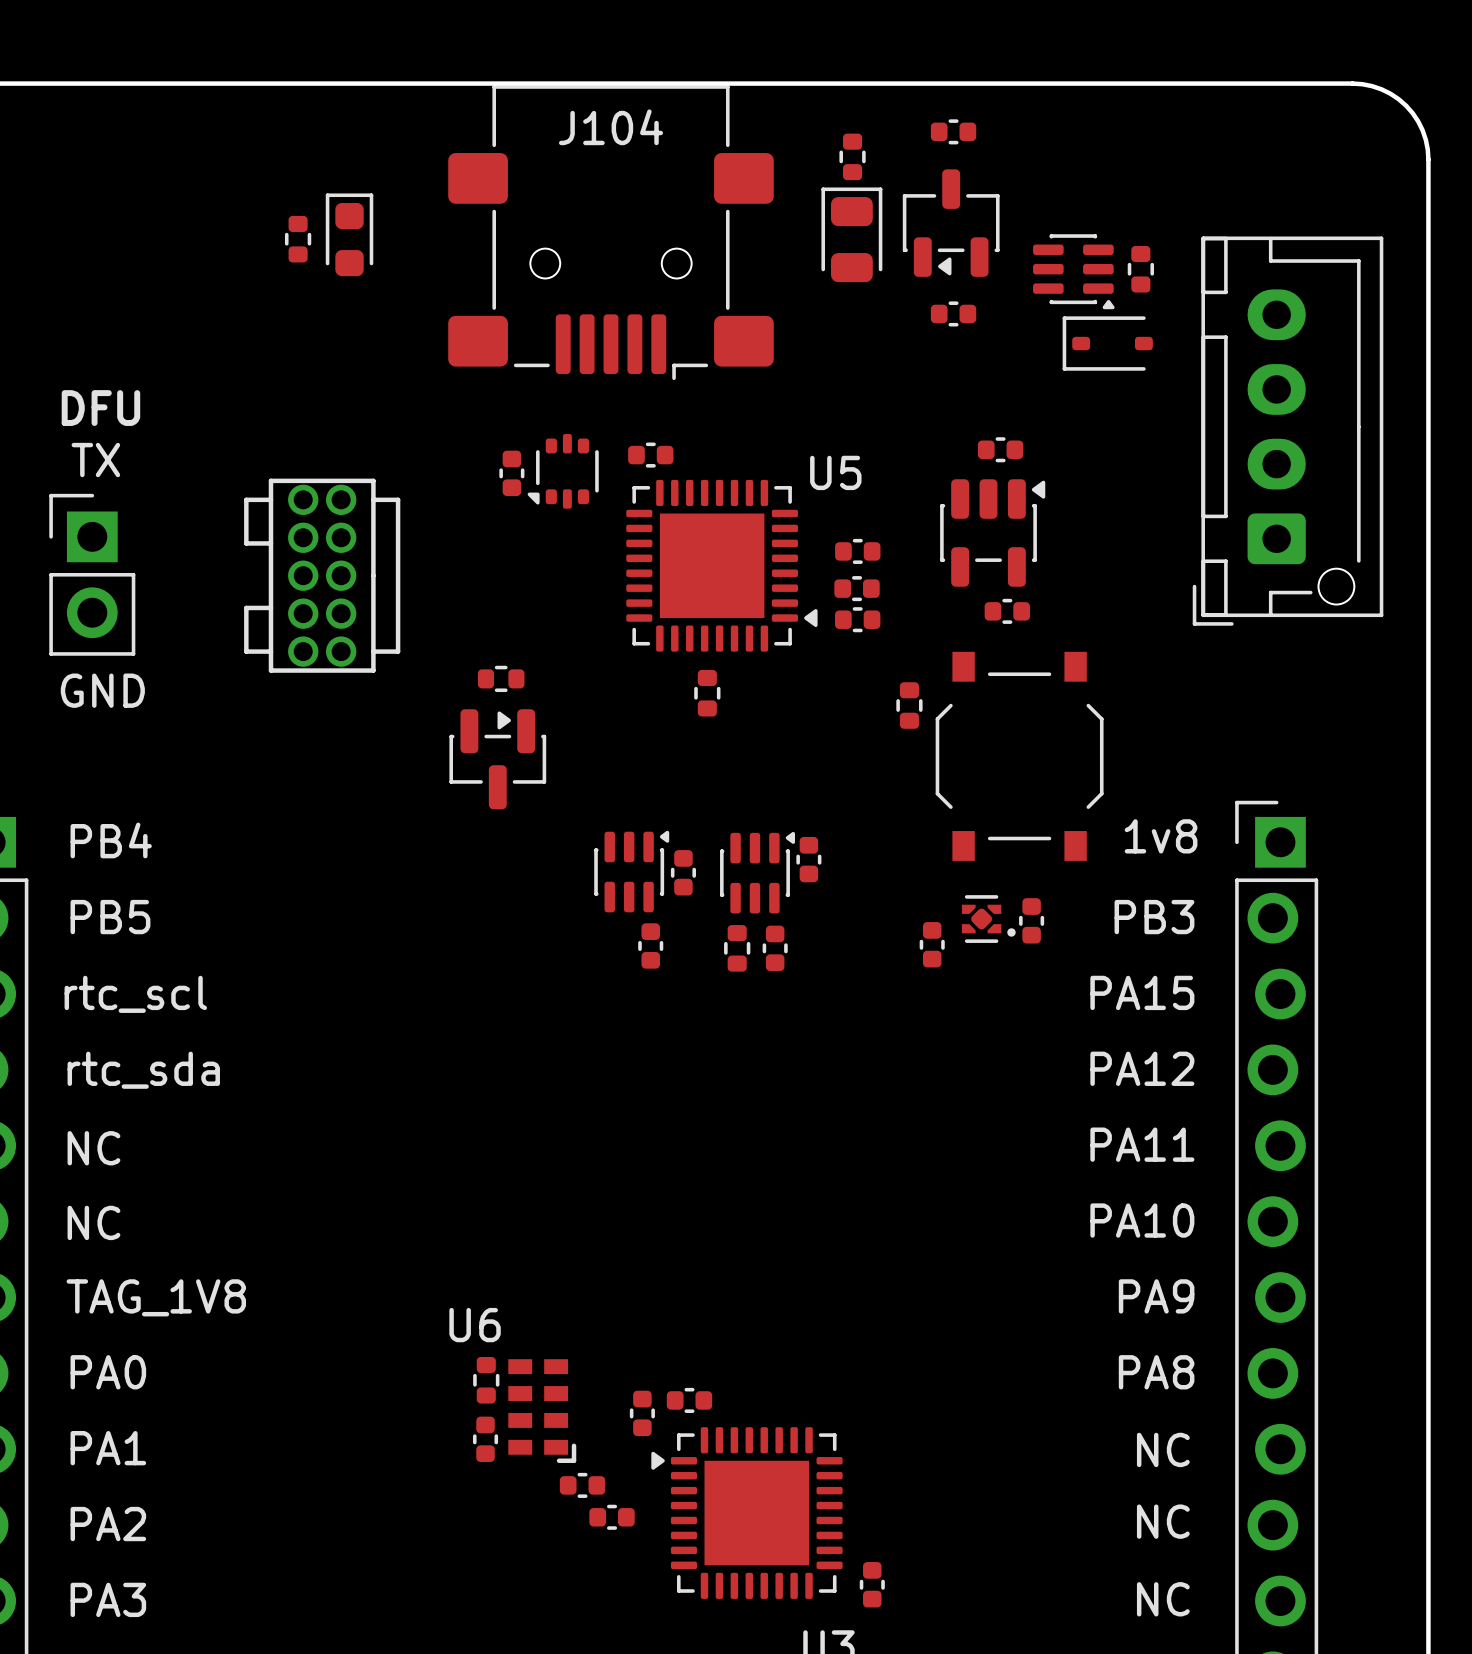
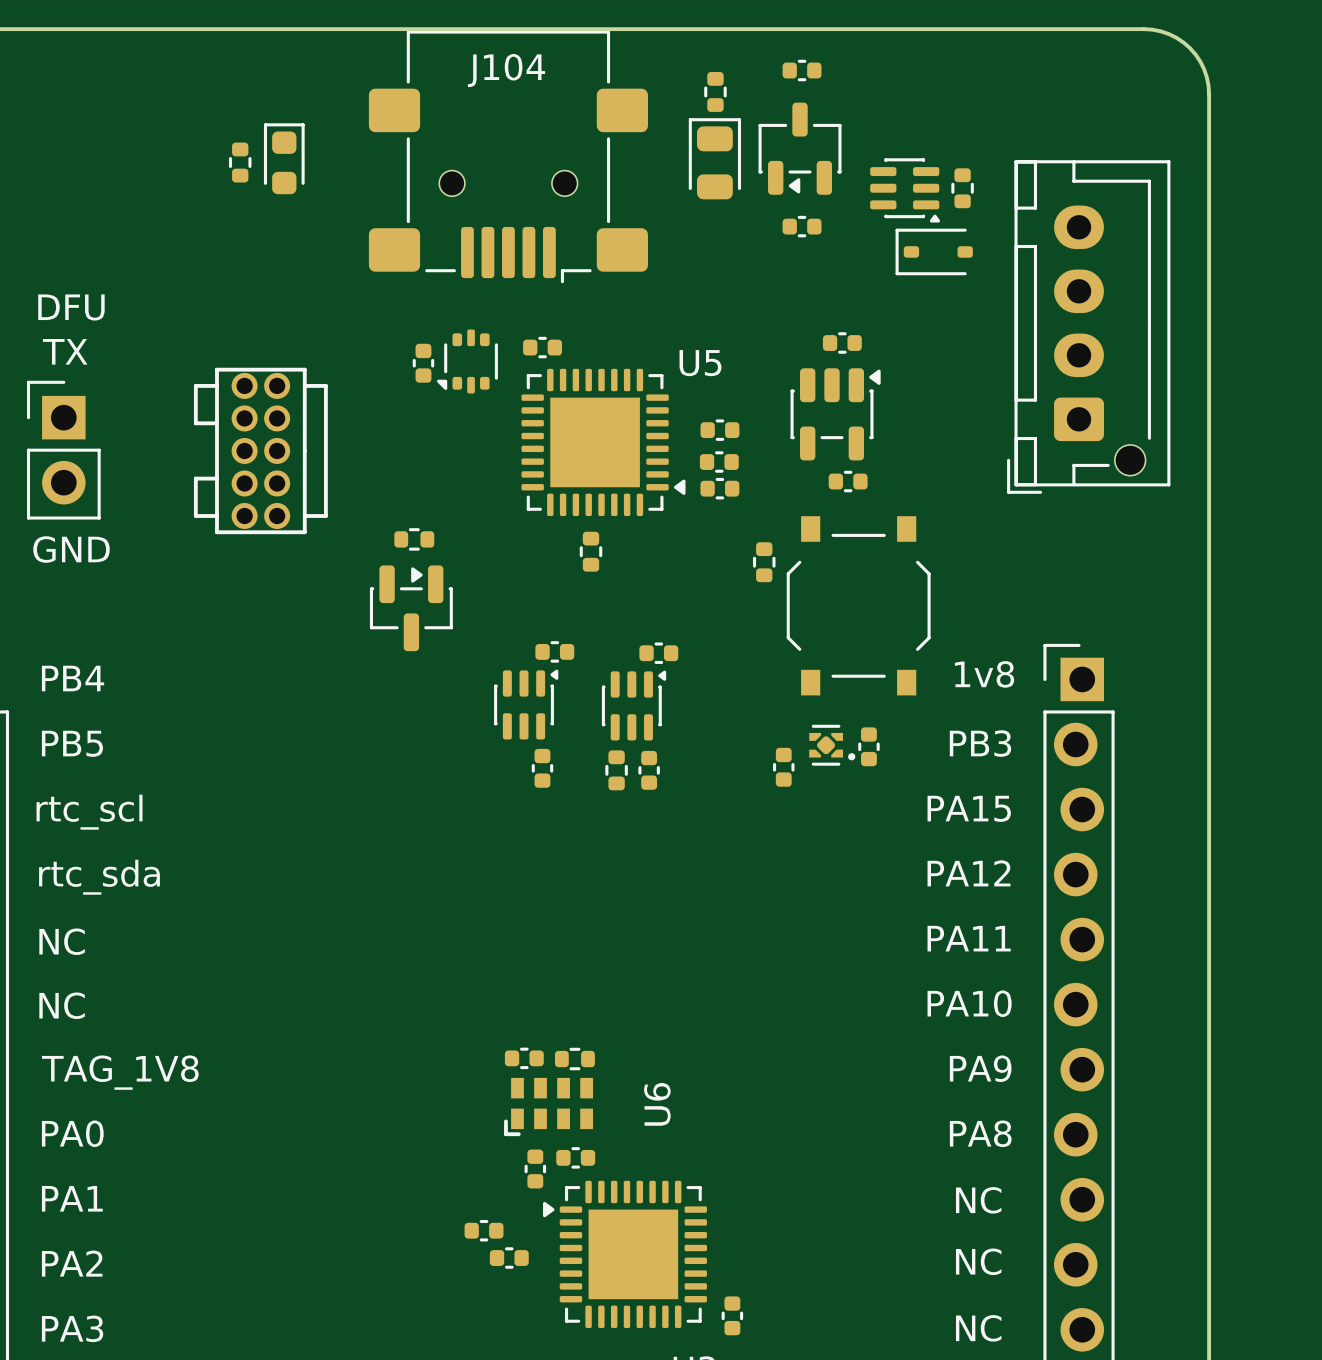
part: none -> (554, 651)
part rotation: 0° (808, 859) -> 90° clockwise (658, 653)
part position: (808, 859) -> (658, 653)
part: (683, 872) -> none
part: none -> (524, 1058)
U6 name position: U6 (475, 1325) -> U6 (657, 1104)
part rotation: 0° (486, 1380) -> 90° clockwise (574, 1059)
part position: (486, 1380) -> (574, 1059)
U6 rotation: 0° (542, 1411) -> 90° clockwise (548, 1107)
U6 position: (542, 1411) -> (548, 1107)
part: (485, 1439) -> none

